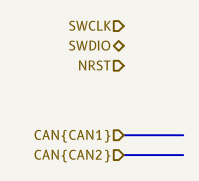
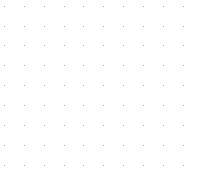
hierarchical label: SWCLK (90, 25) -> none
hierarchical label: SWDIO (89, 45) -> none
hierarchical label: NRST (94, 65) -> none
bus: (123, 135) (183, 135) -> none
hierarchical label: CAN{CAN1} (72, 136) -> none
bus: (123, 155) (183, 155) -> none
hierarchical label: CAN{CAN2} (72, 156) -> none

